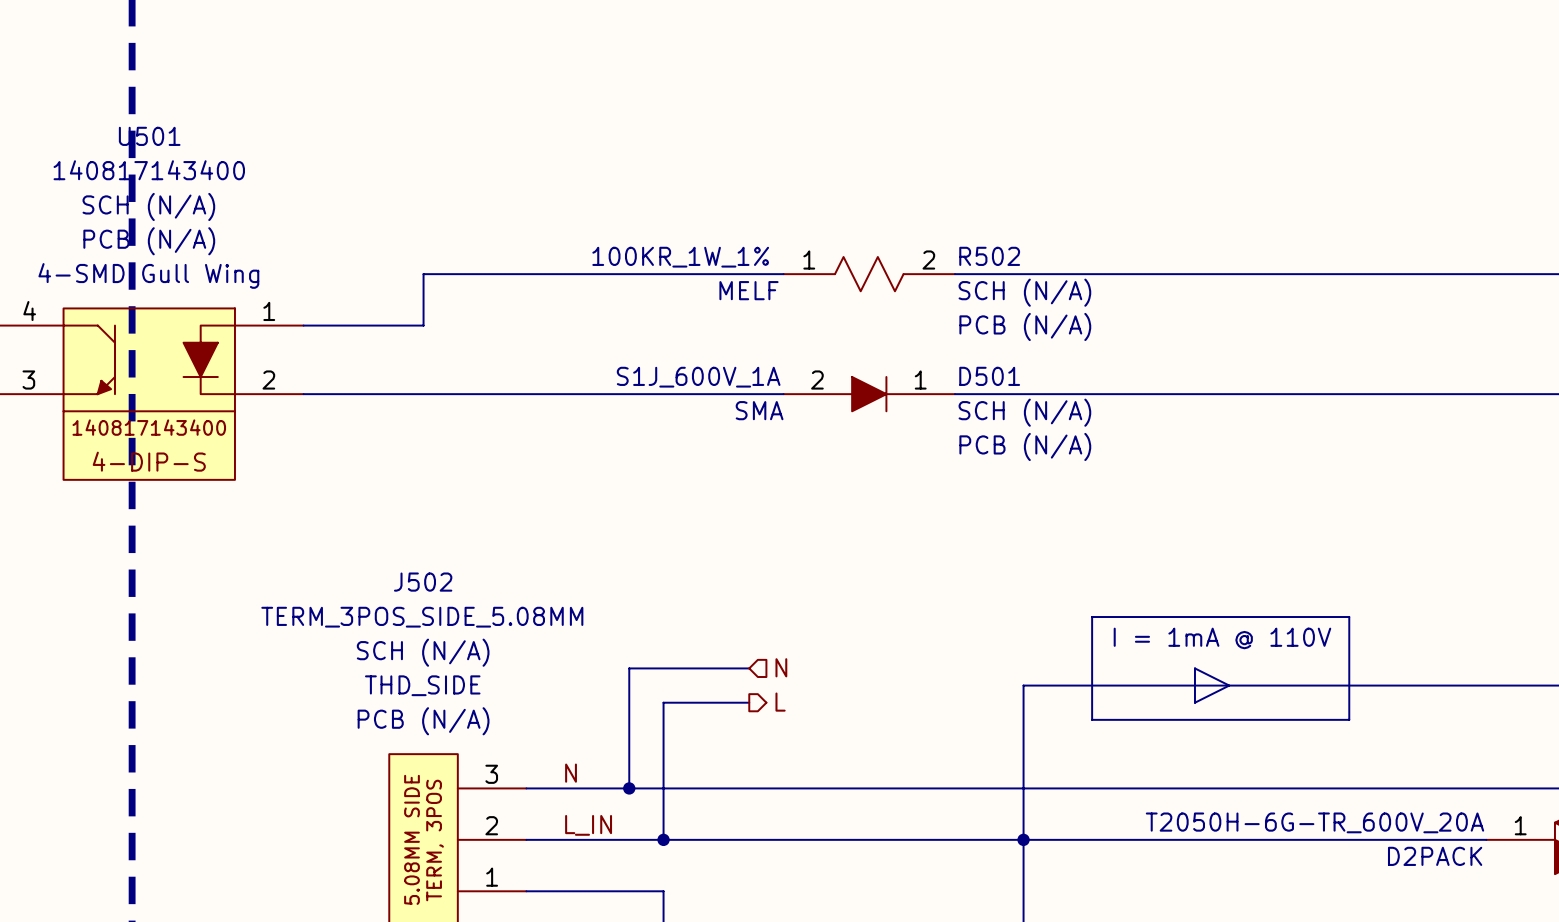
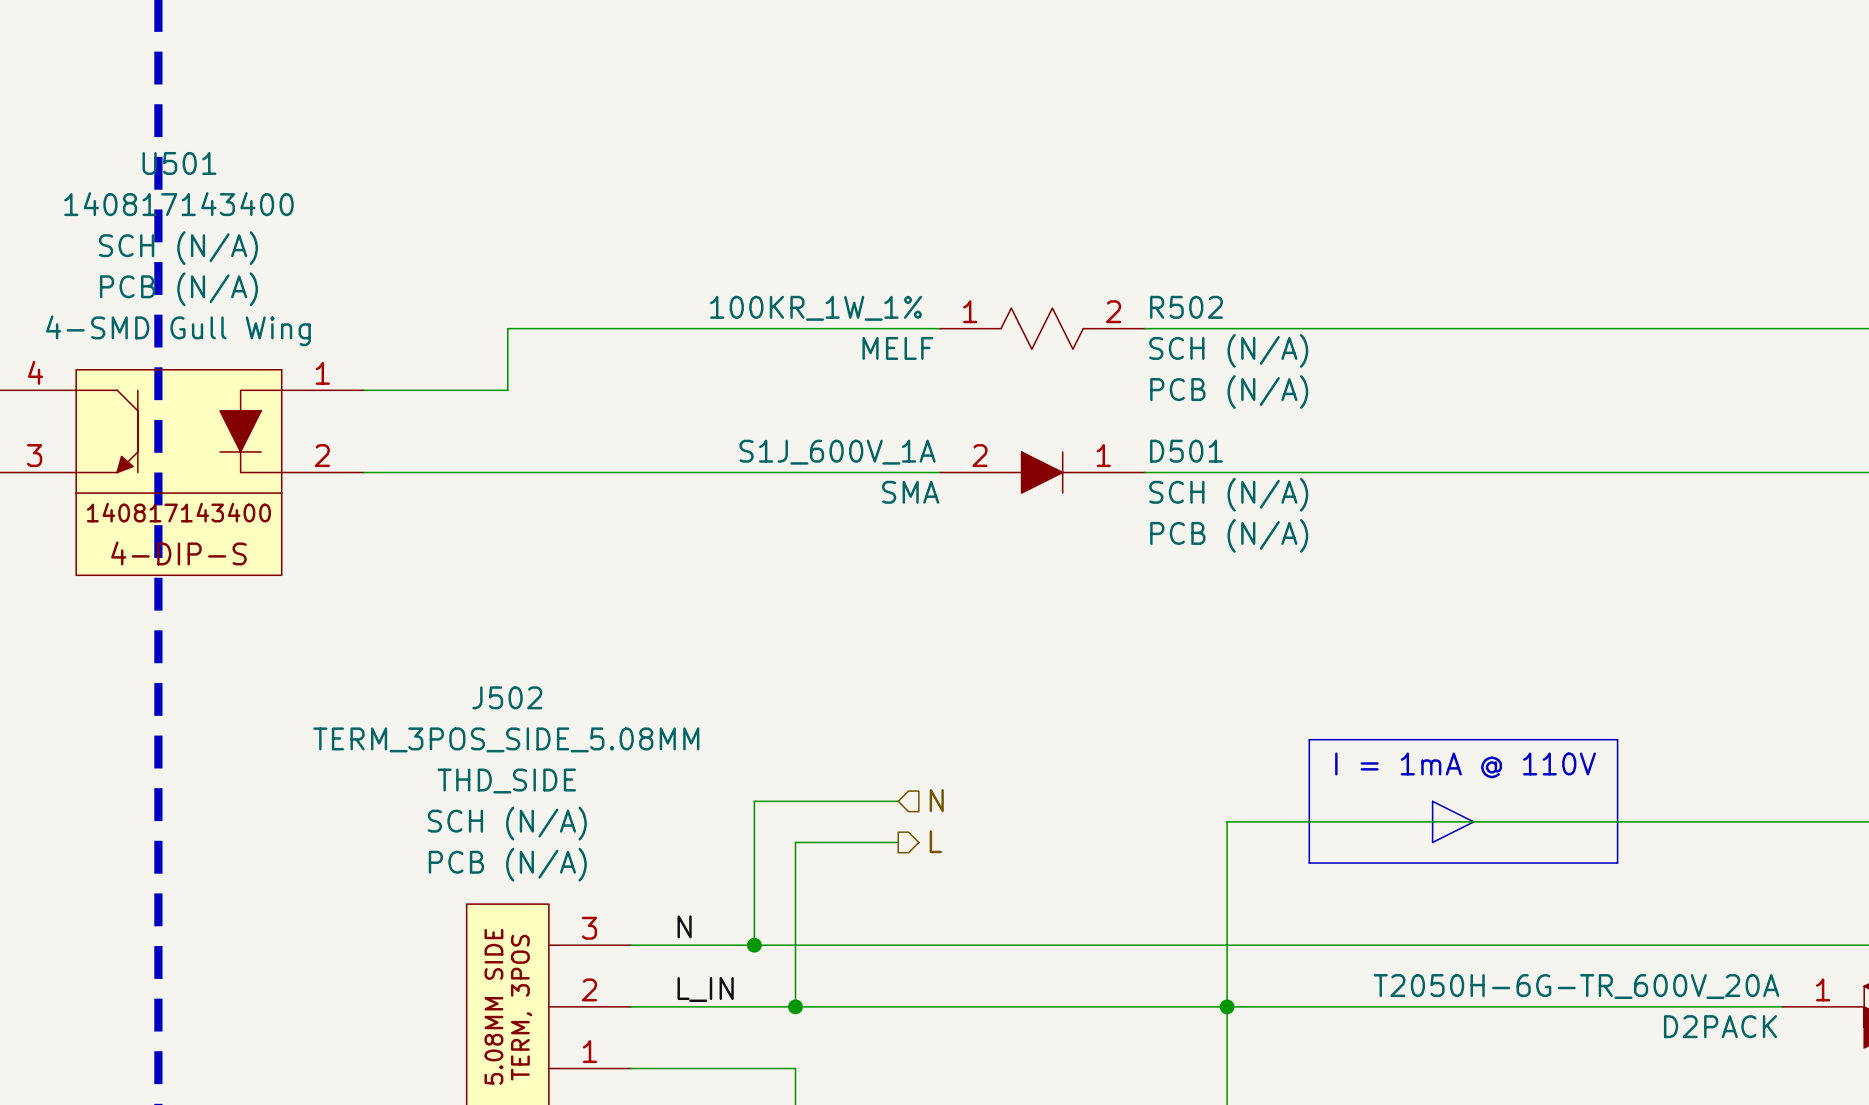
J502 text position: SCH (N/A) (423, 652) -> SCH (N/A) (507, 823)
J502 text position: THD_SIDE (422, 685) -> THD_SIDE (506, 781)

